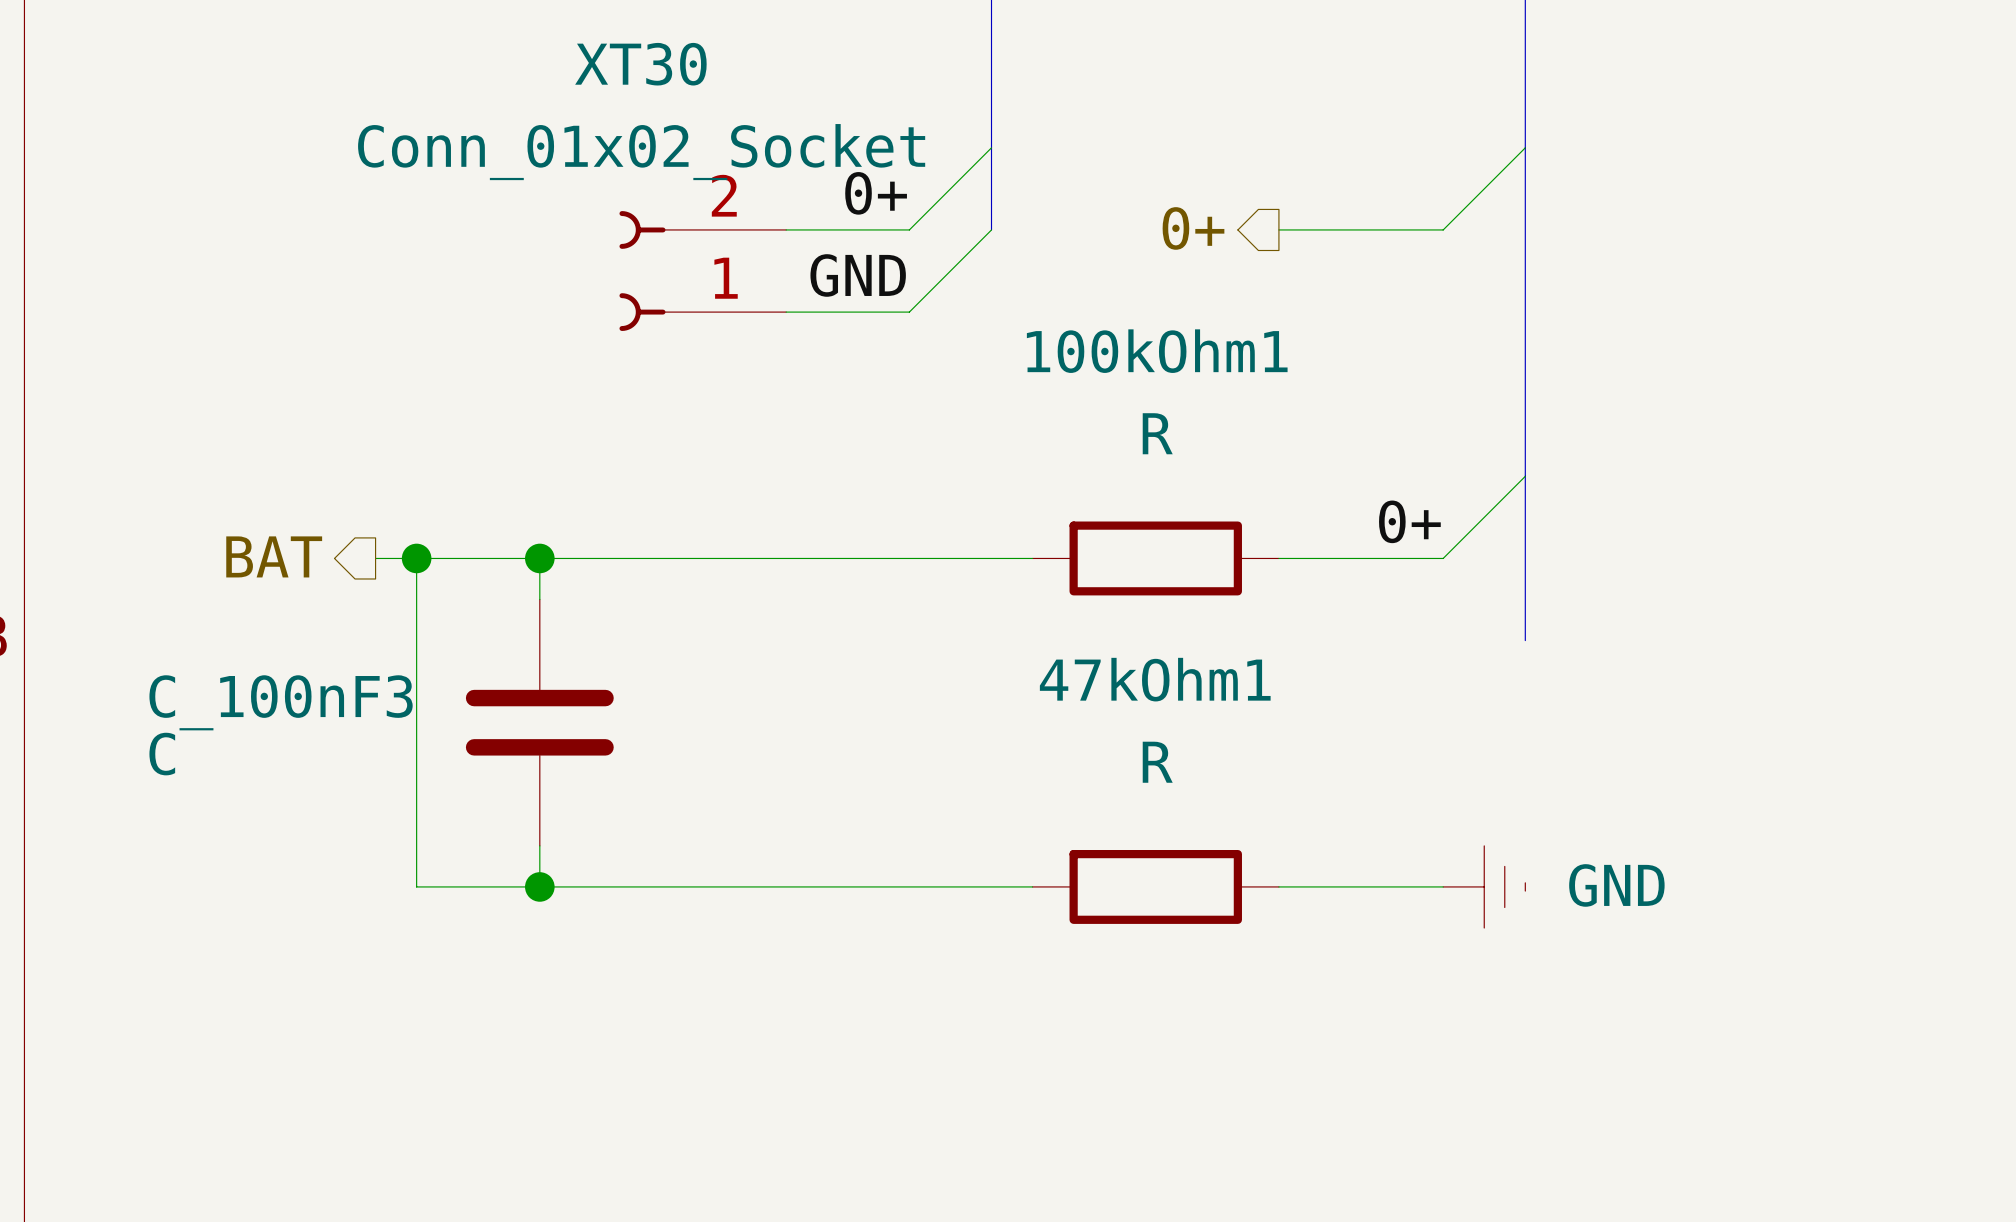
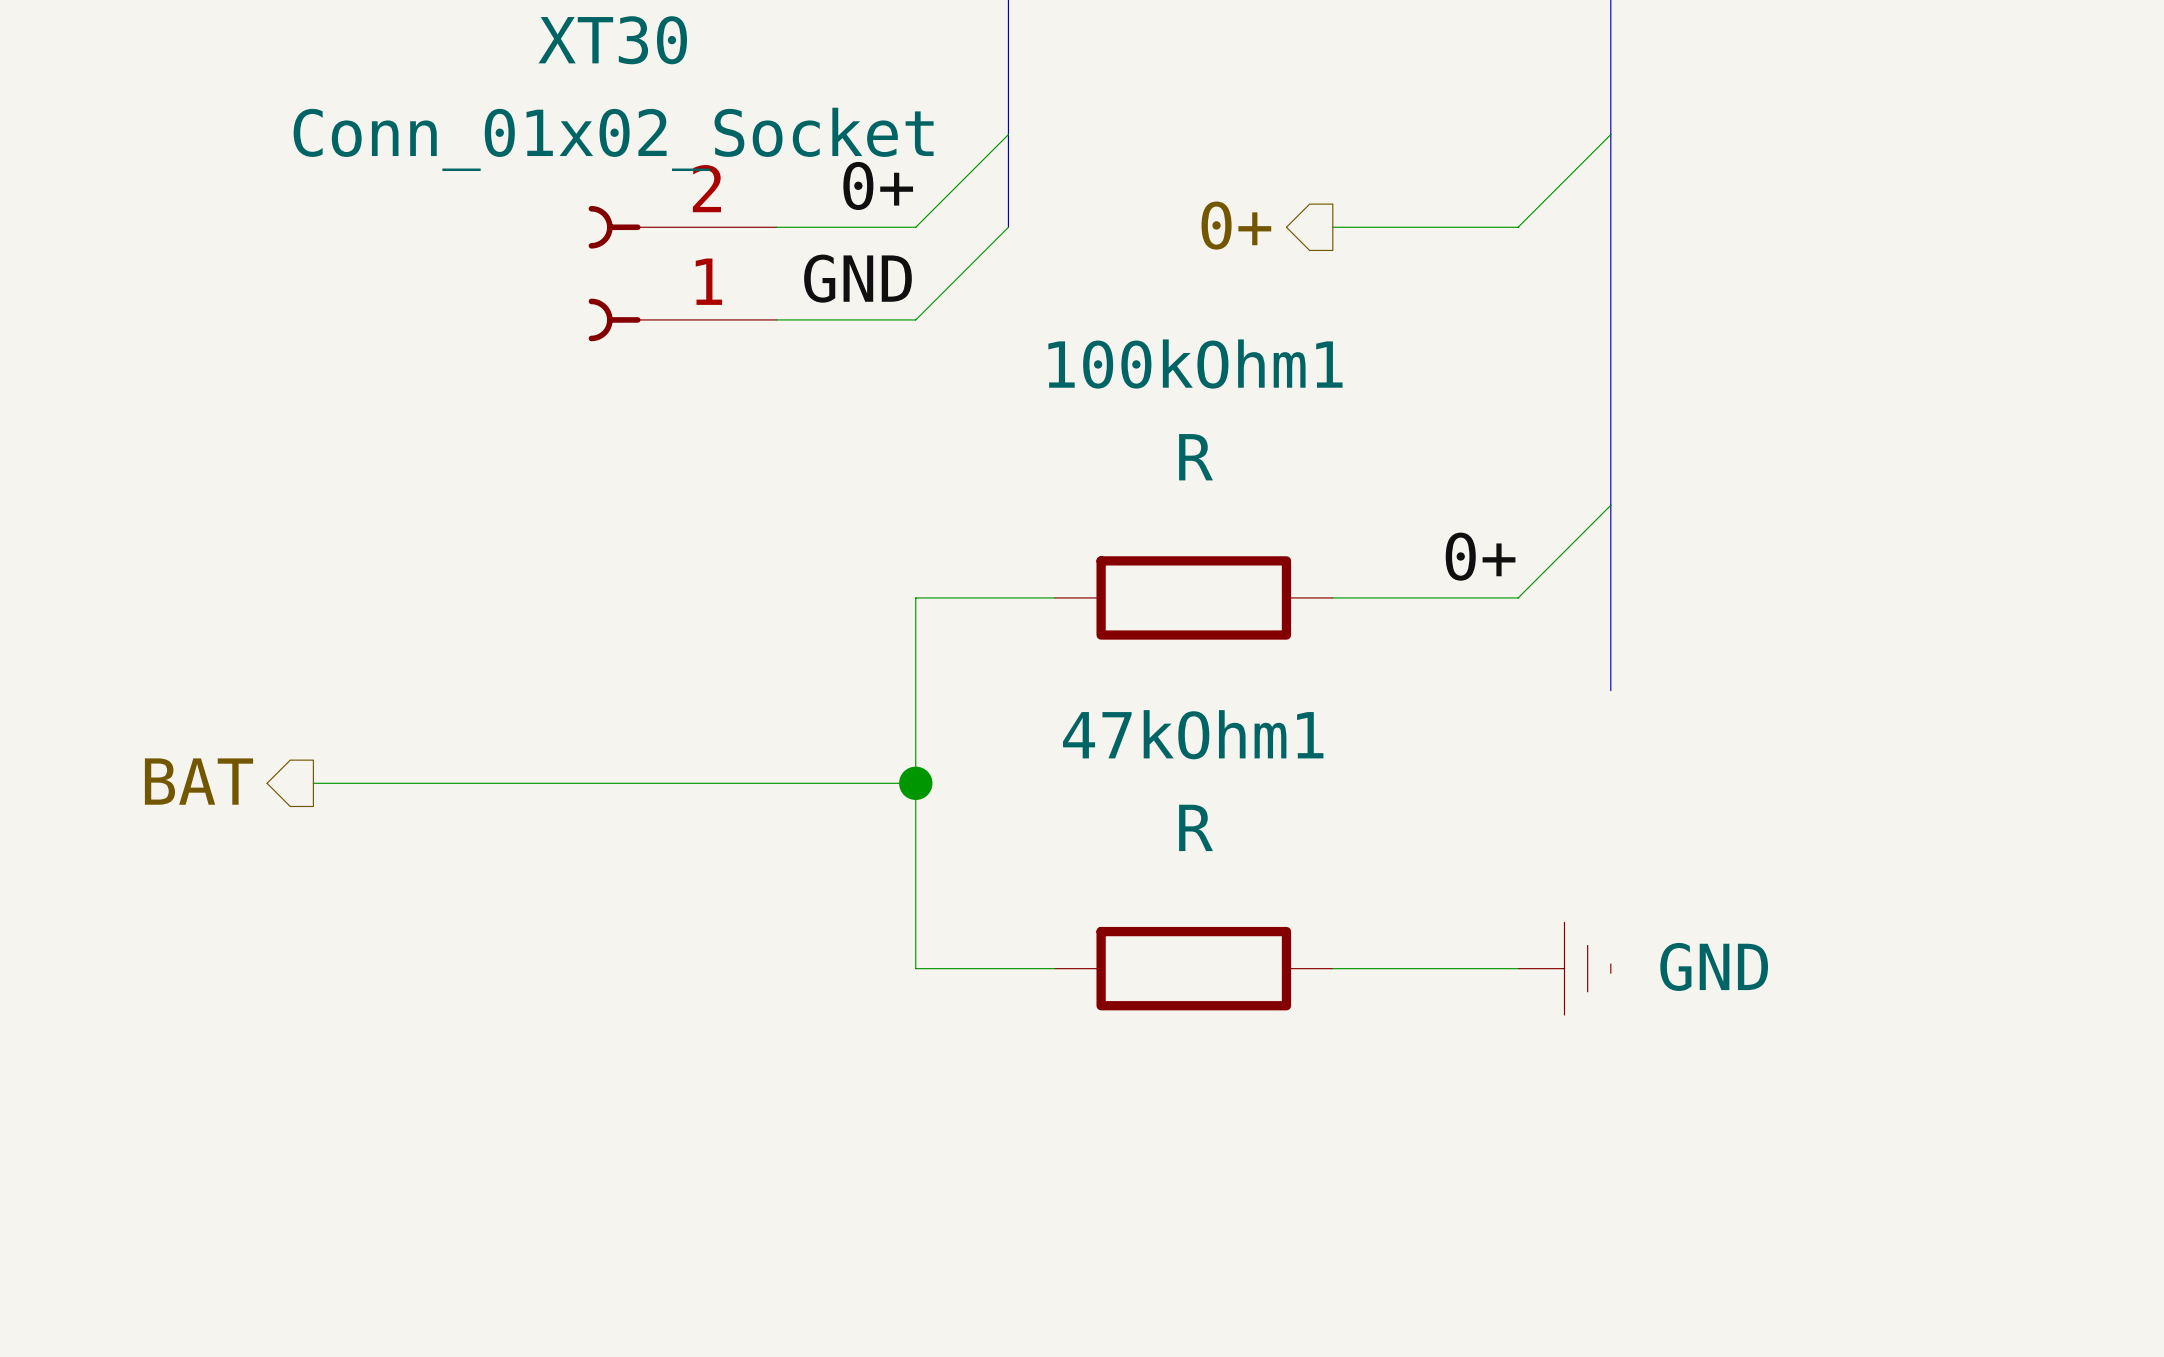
hierarchical label position: BAT (274, 556) -> BAT (198, 781)
wire: (375, 558) (909, 558) -> (313, 783) (915, 783)
wire: (416, 558) (416, 886) (909, 886) -> (915, 597) (915, 968)
junction: (416, 558) -> none
wire: (539, 558) (539, 599) -> none
junction: (539, 558) -> none
C_100nF3: C (539, 722) -> none
junction: none -> (915, 783)
wire: (539, 845) (539, 886) -> none
junction: (539, 886) -> none

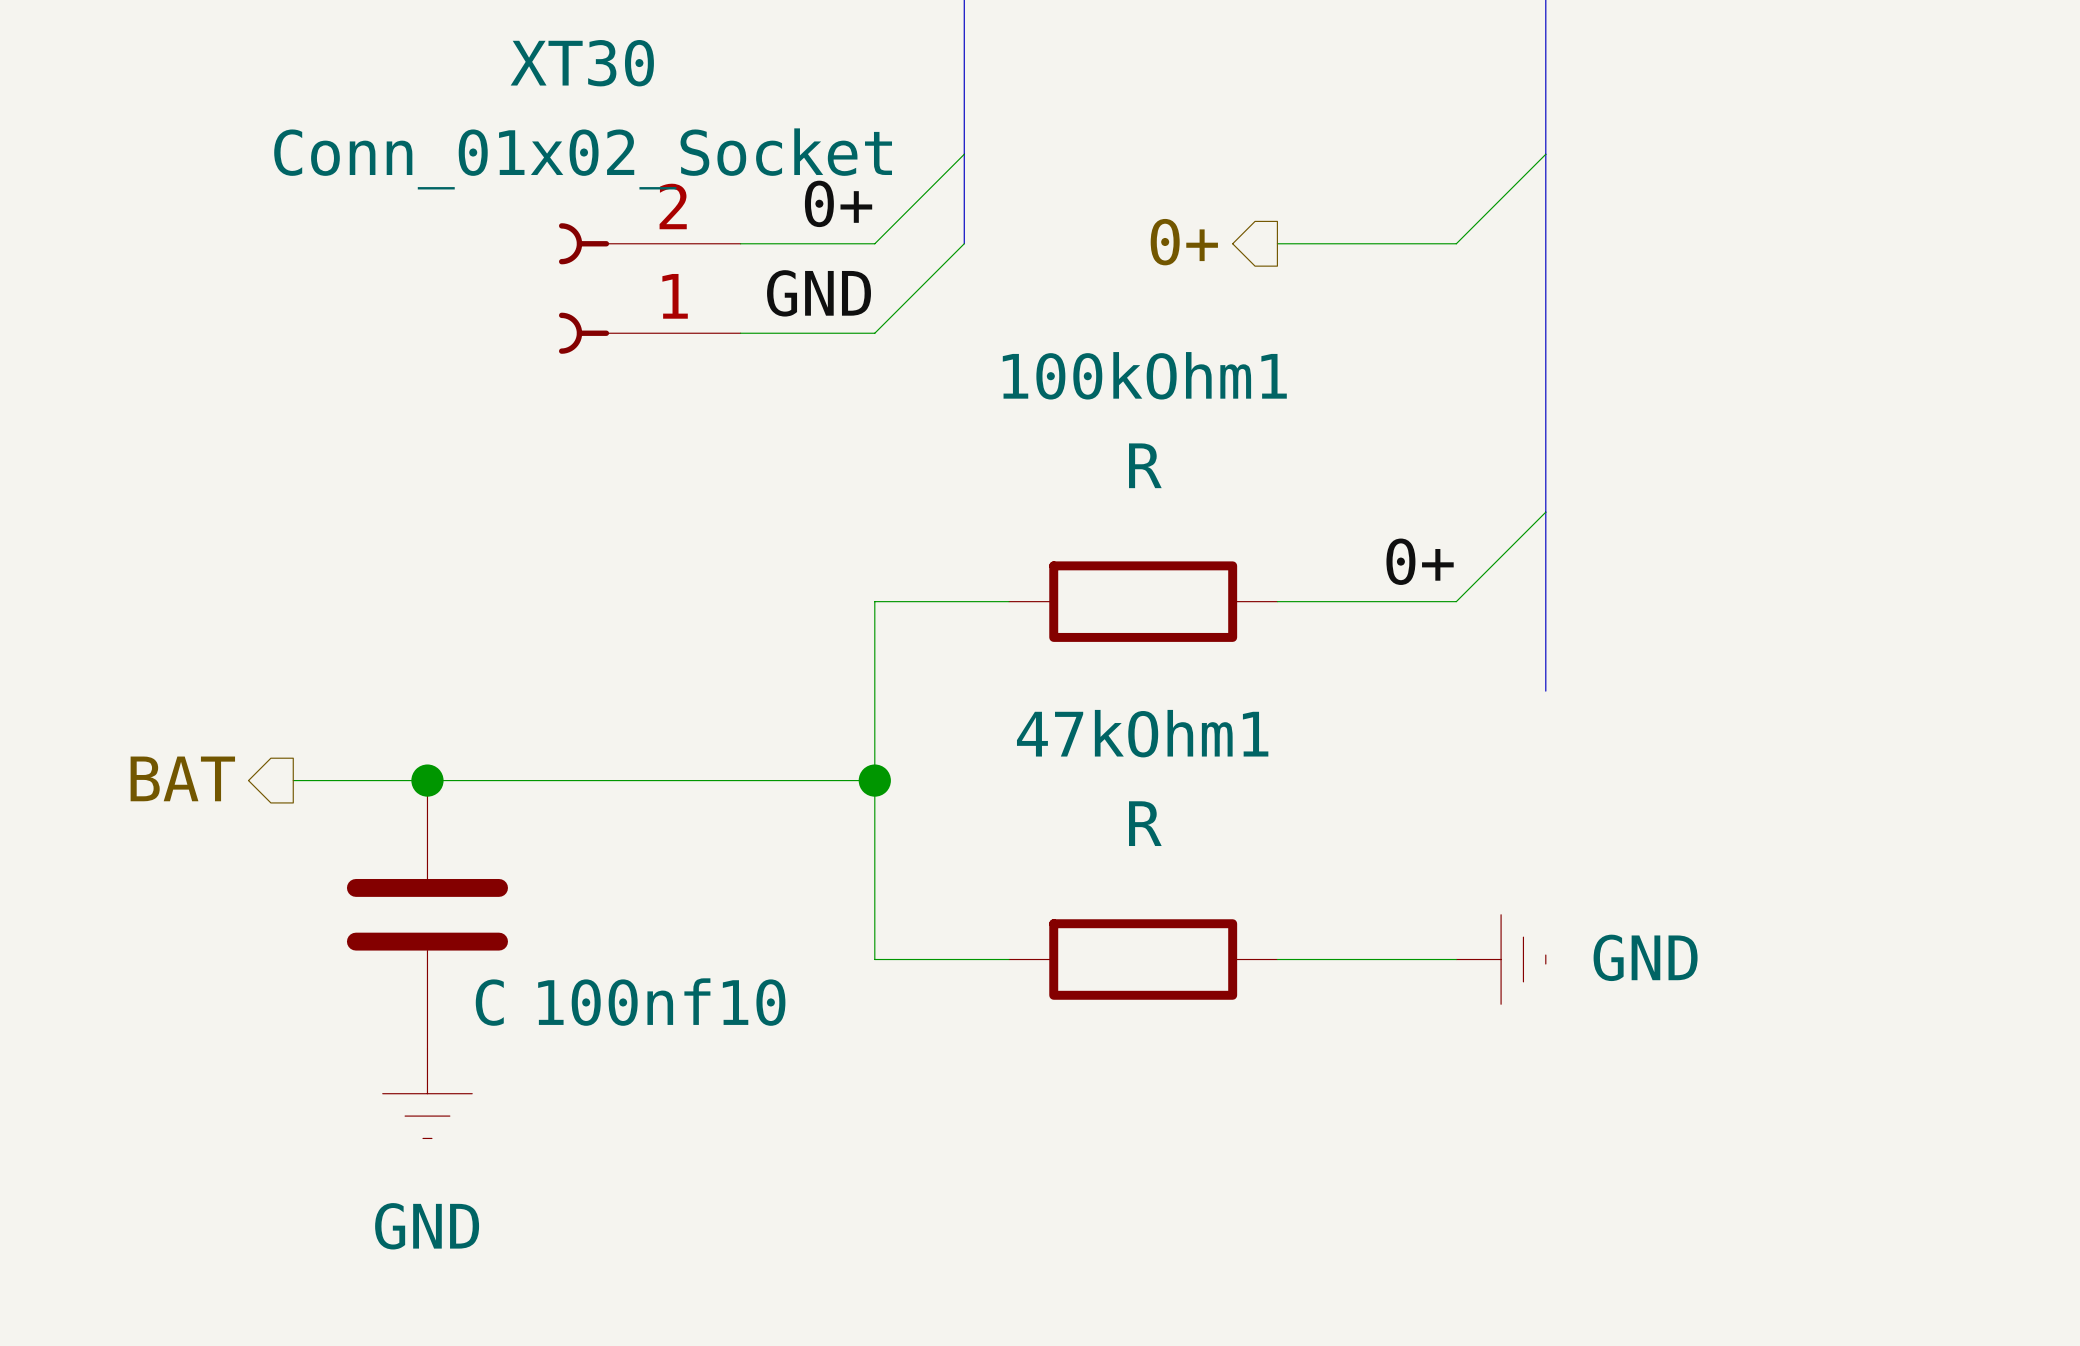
junction: none -> (427, 780)
100nf10: none -> C (427, 914)
power symbol: none -> GND (427, 1093)

